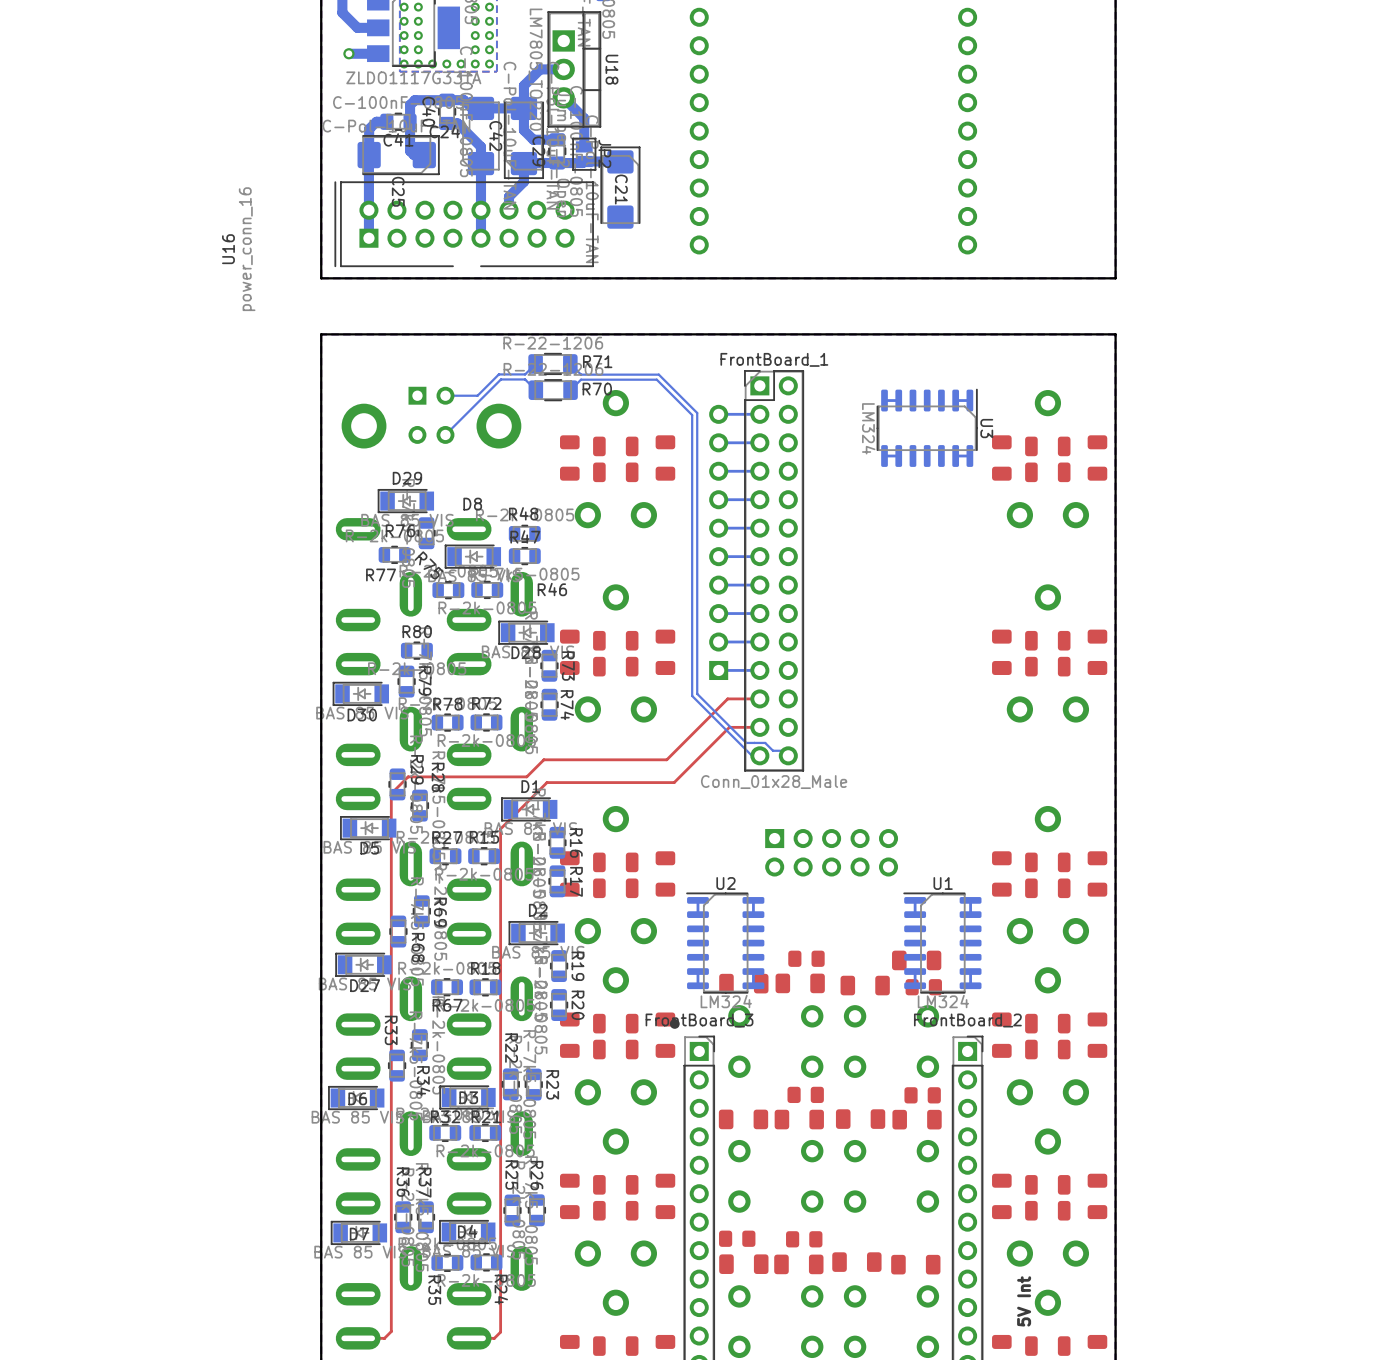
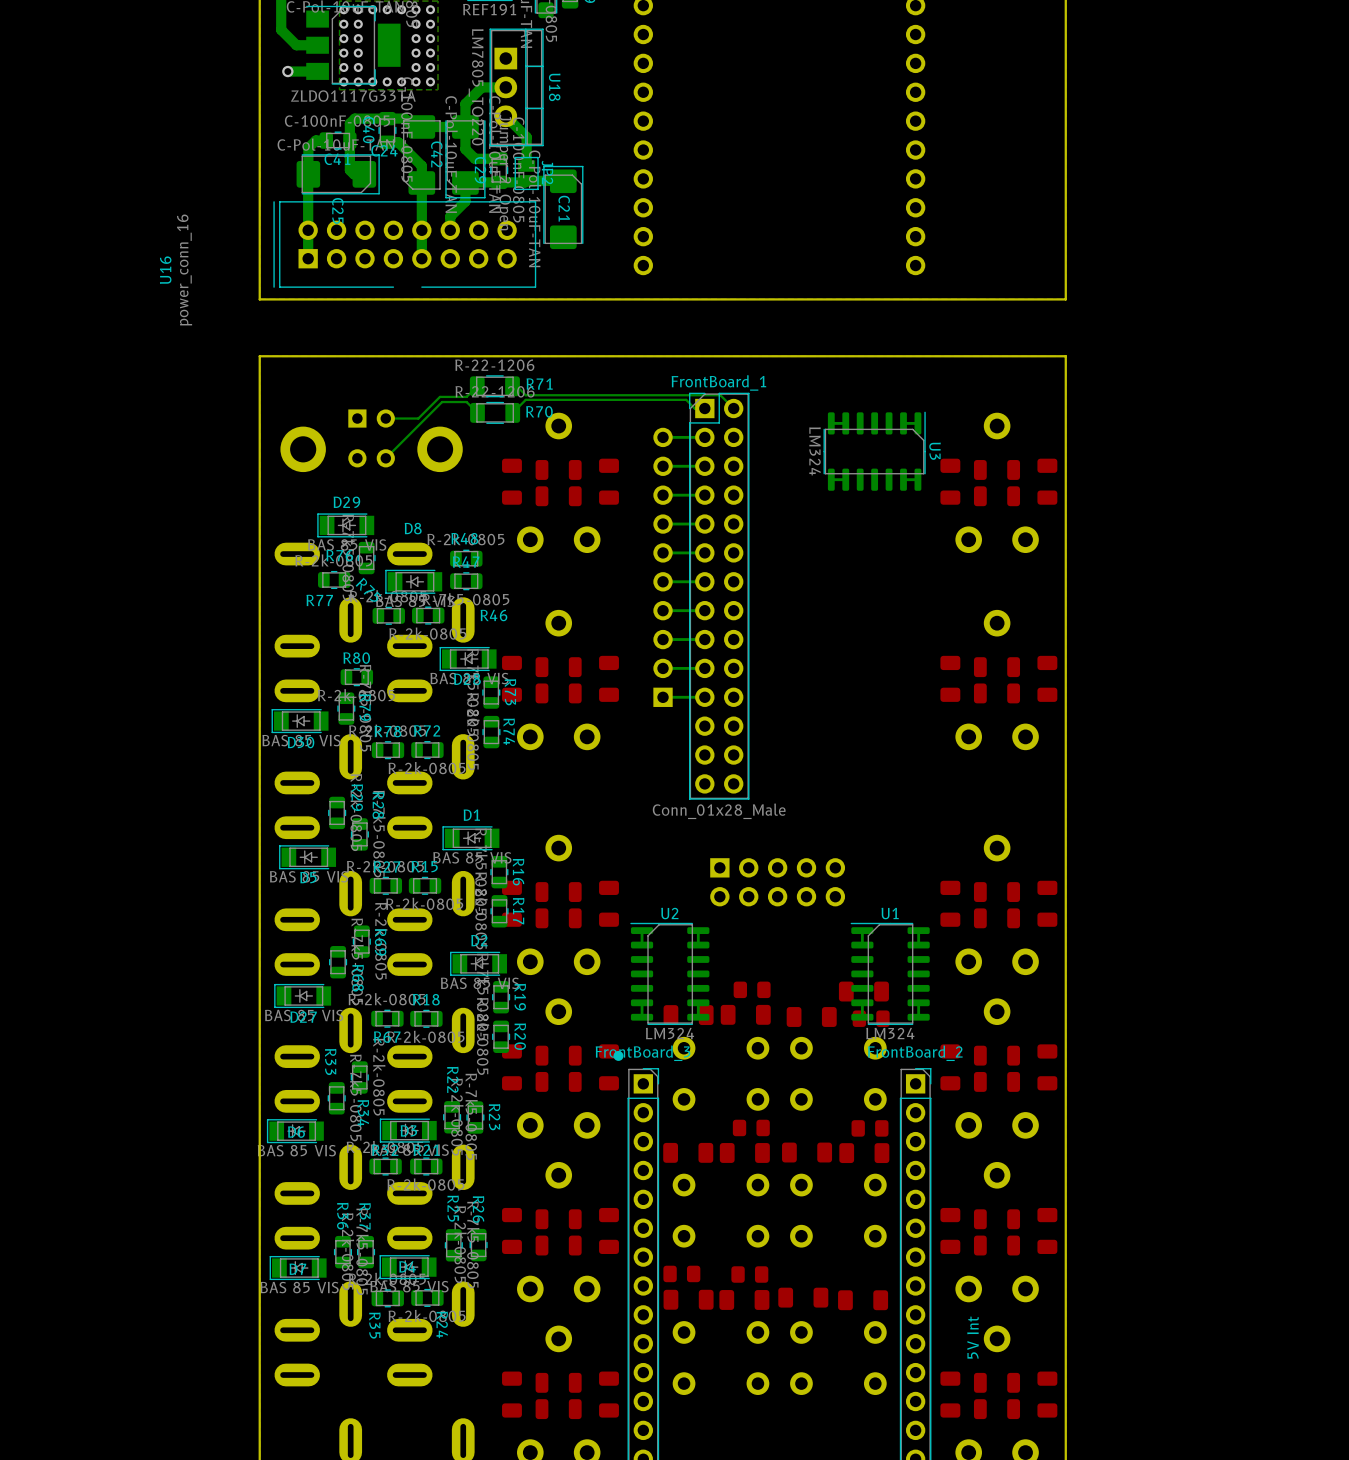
bottom track: (570, 363) (581, 374) (658, 374) (697, 412) (697, 693) (746, 742) (765, 742) (773, 750) (783, 750) (788, 755) -> (512, 386) (516, 386) (525, 395) (720, 395) (733, 408)
bottom track: (581, 379) (656, 379) (692, 415) (692, 695) (752, 755) (759, 755) -> (523, 402) (525, 399) (686, 399) (694, 408) (704, 408)
top track: (759, 698) (727, 698) (666, 759) (543, 759) (526, 776) (408, 776) (391, 793) (391, 1331) (384, 1338) (358, 1338) -> none
top track: (759, 727) (729, 727) (674, 782) (546, 782) (500, 828) (500, 1332) (494, 1338) (469, 1338) -> none

